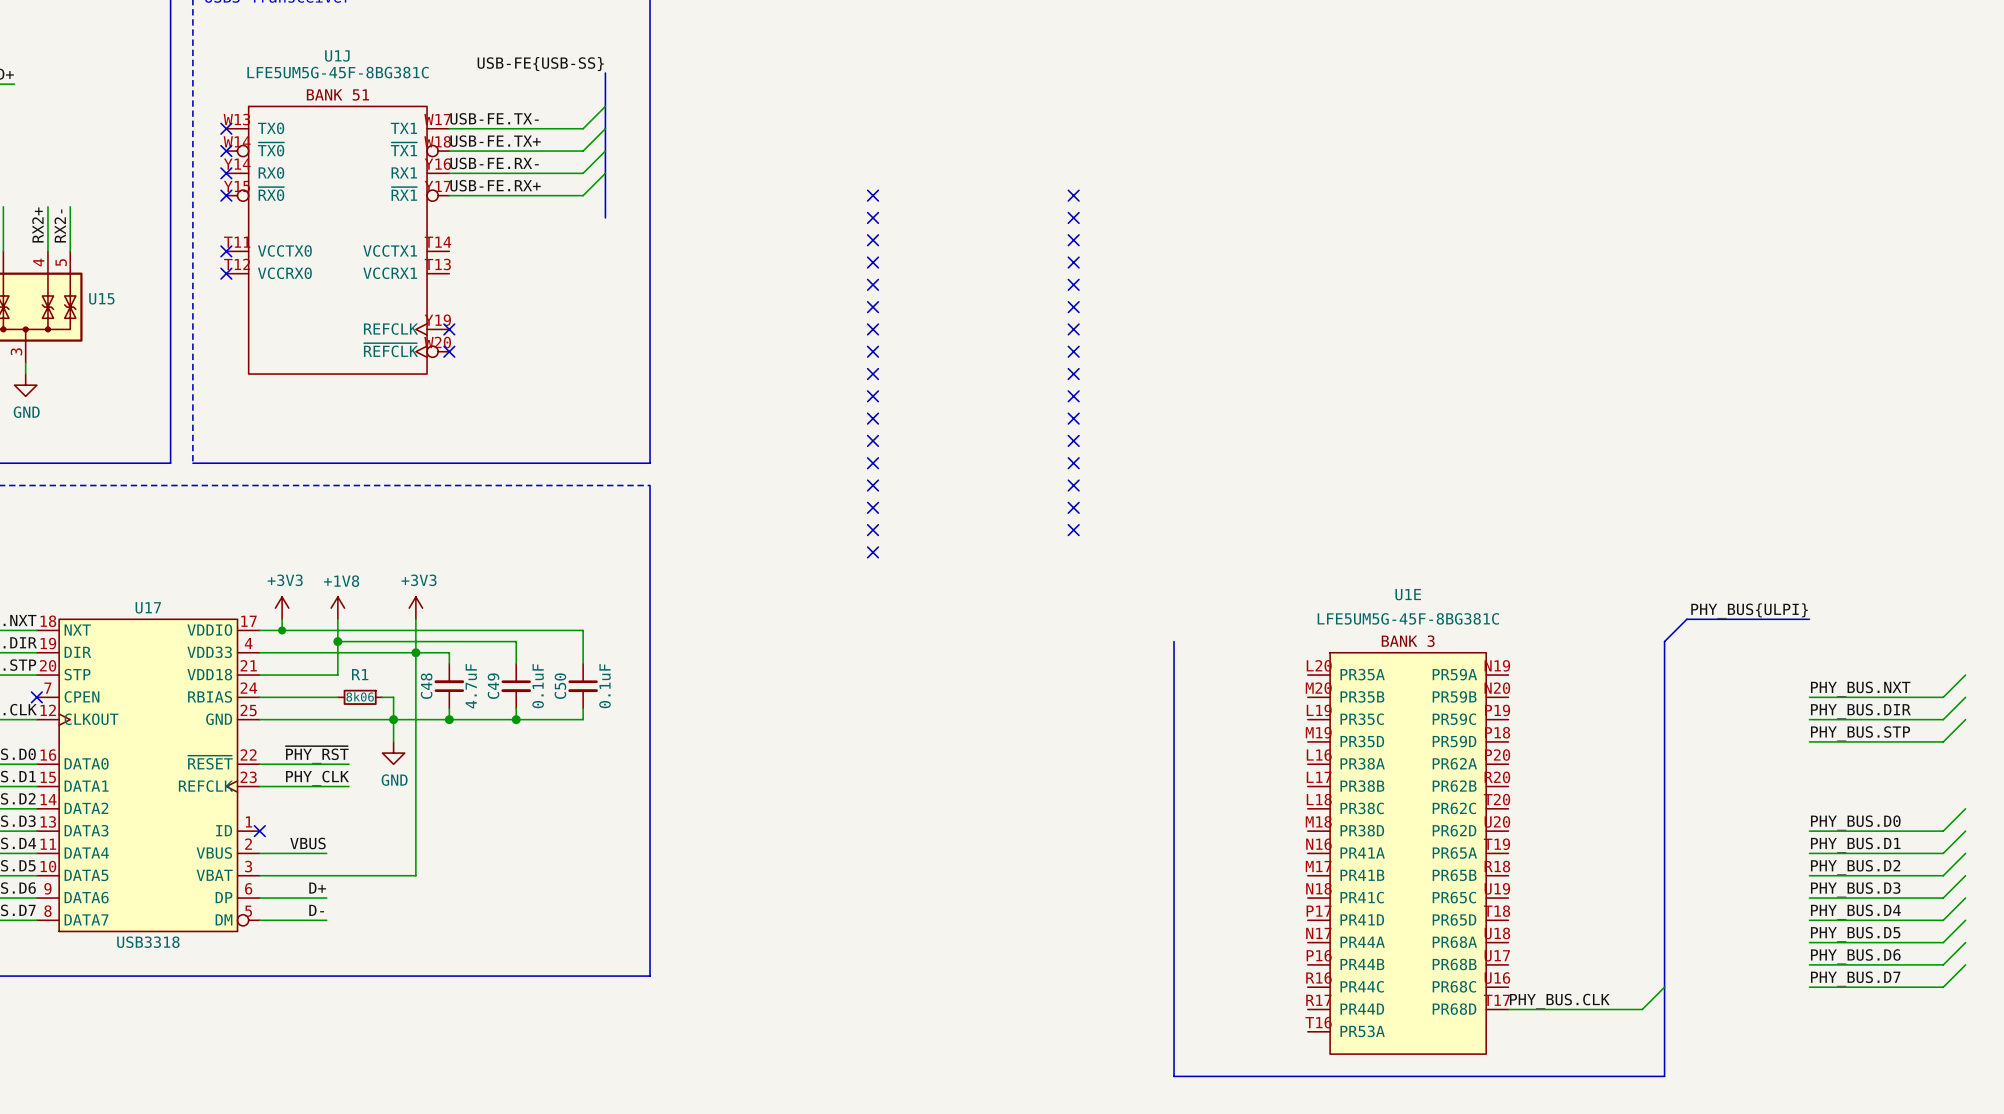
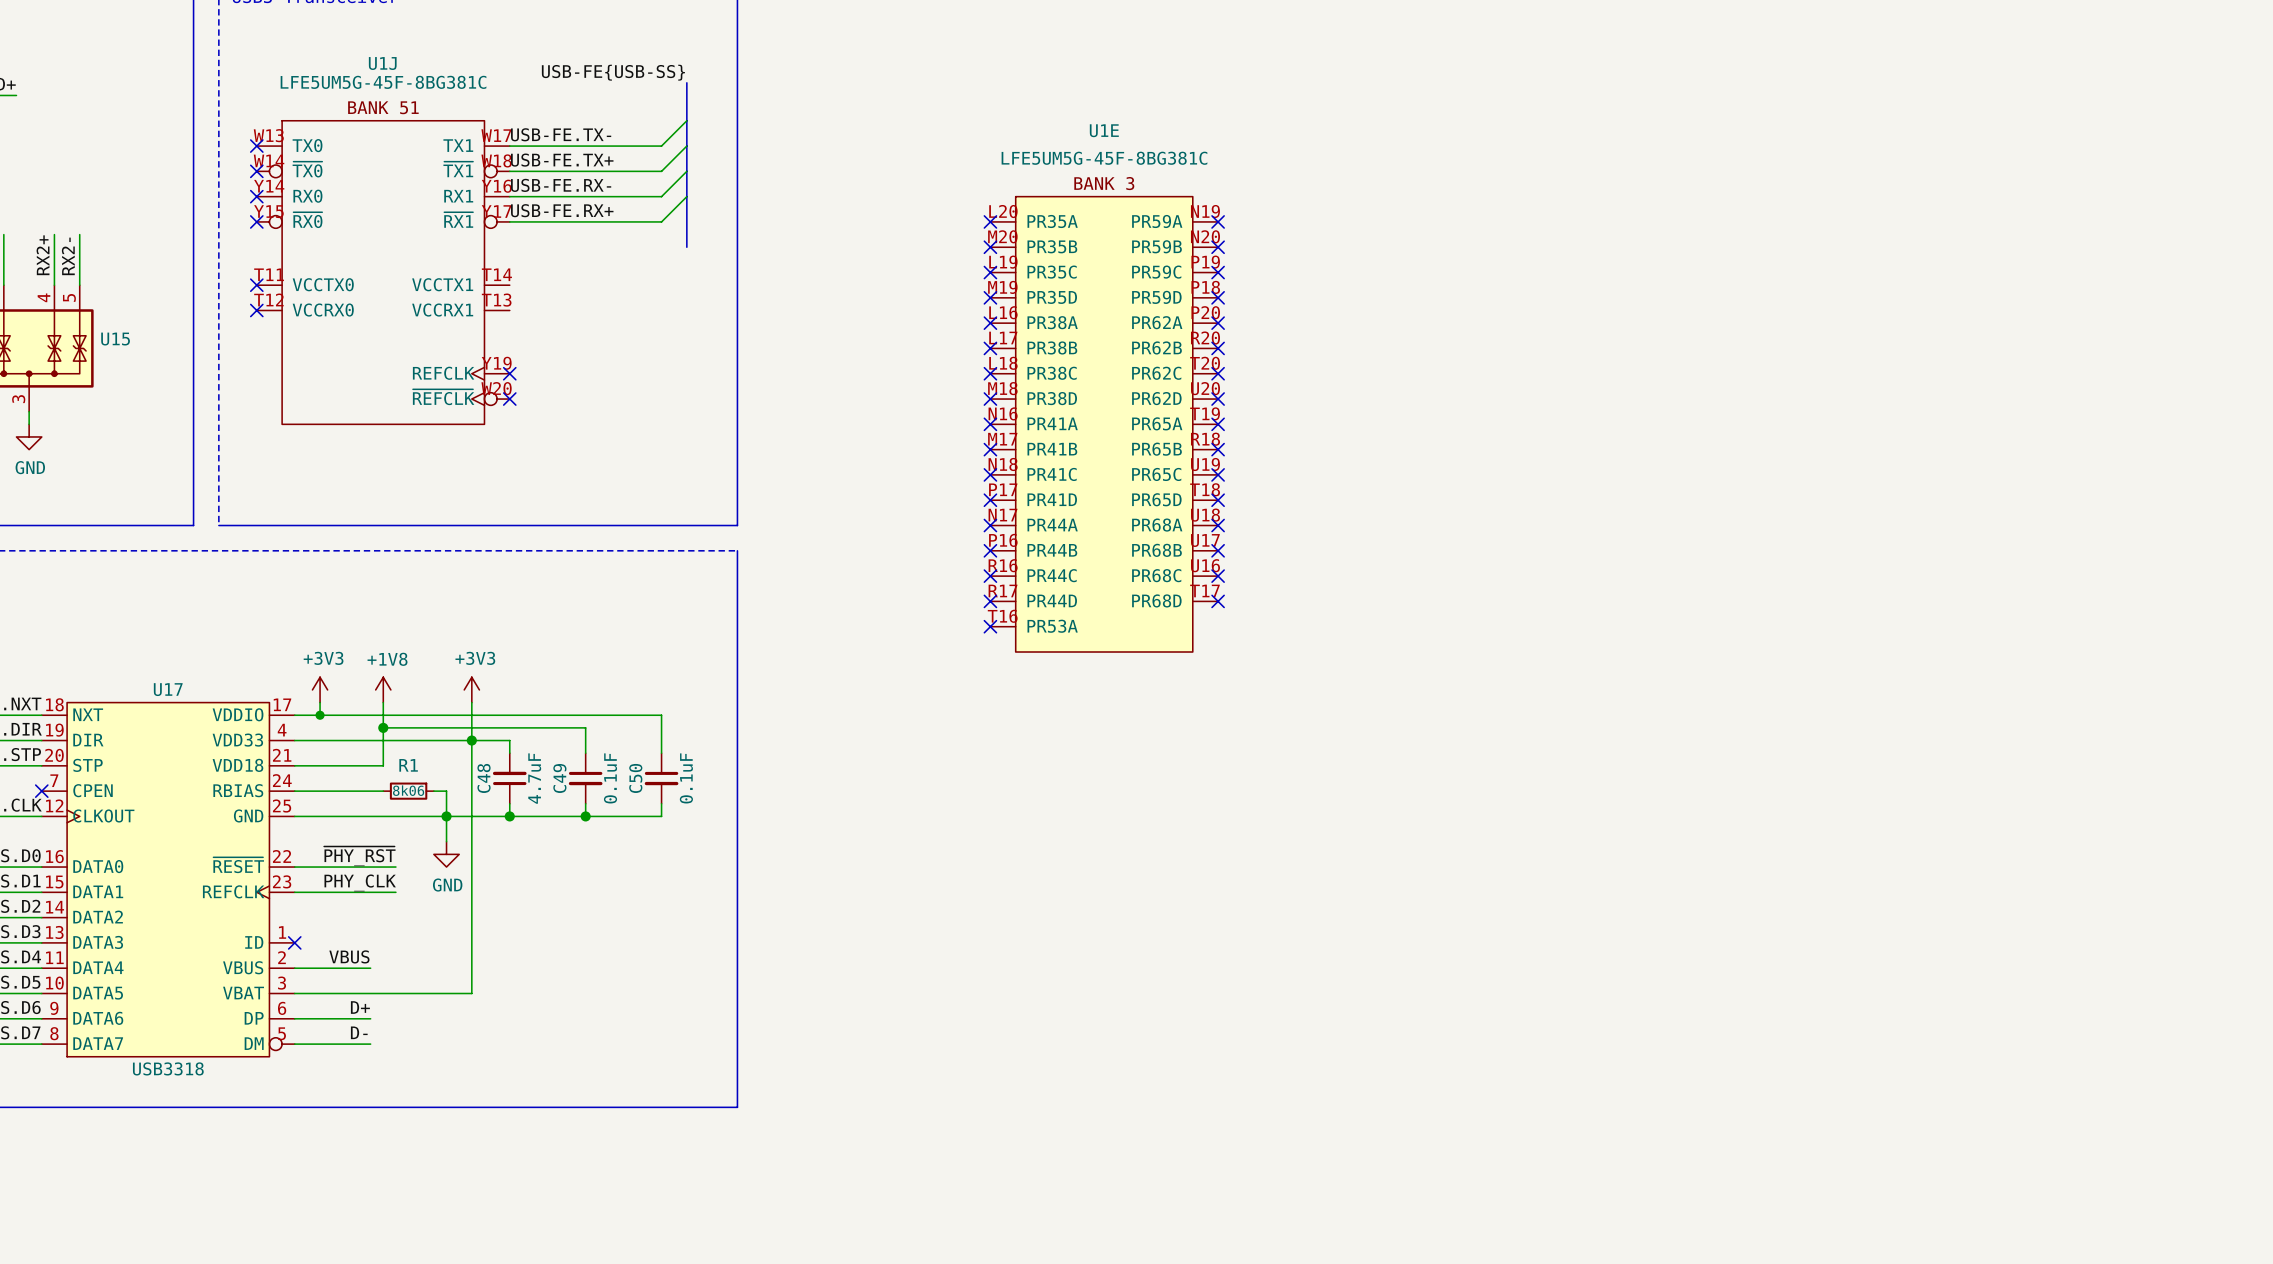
label: PHY_BUS{ULPI} (1749, 610) -> none
bus: (1809, 619) (1686, 619) (1664, 641) (1664, 1076) (1174, 1076) (1174, 641) -> none
wire: (1965, 675) (1943, 697) (1809, 697) -> none
label: PHY_BUS.NXT (1860, 689) -> none
wire: (1965, 697) (1943, 719) (1809, 719) -> none
label: PHY_BUS.DIR (1860, 711) -> none
wire: (1965, 719) (1943, 741) (1809, 741) -> none
label: PHY_BUS.STP (1860, 733) -> none
wire: (1965, 808) (1943, 831) (1809, 831) -> none
label: PHY_BUS.D0 (1855, 822) -> none
wire: (1965, 831) (1943, 853) (1809, 853) -> none
label: PHY_BUS.D1 (1855, 845) -> none
U1E position: (1408, 853) -> (1104, 424)
wire: (1965, 853) (1943, 875) (1809, 875) -> none
label: PHY_BUS.D2 (1855, 867) -> none
wire: (1965, 875) (1943, 898) (1809, 898) -> none
label: PHY_BUS.D3 (1855, 889) -> none
wire: (1965, 898) (1943, 920) (1809, 920) -> none
label: PHY_BUS.D4 (1855, 912) -> none
wire: (1965, 920) (1943, 942) (1809, 942) -> none
label: PHY_BUS.D5 (1855, 934) -> none
wire: (1965, 942) (1943, 964) (1809, 964) -> none
label: PHY_BUS.D6 (1855, 956) -> none
wire: (1965, 964) (1943, 987) (1809, 987) -> none
label: PHY_BUS.D7 (1855, 978) -> none
wire: (1664, 987) (1642, 1009) (1508, 1009) -> none
label: PHY_BUS.CLK (1559, 1001) -> none

